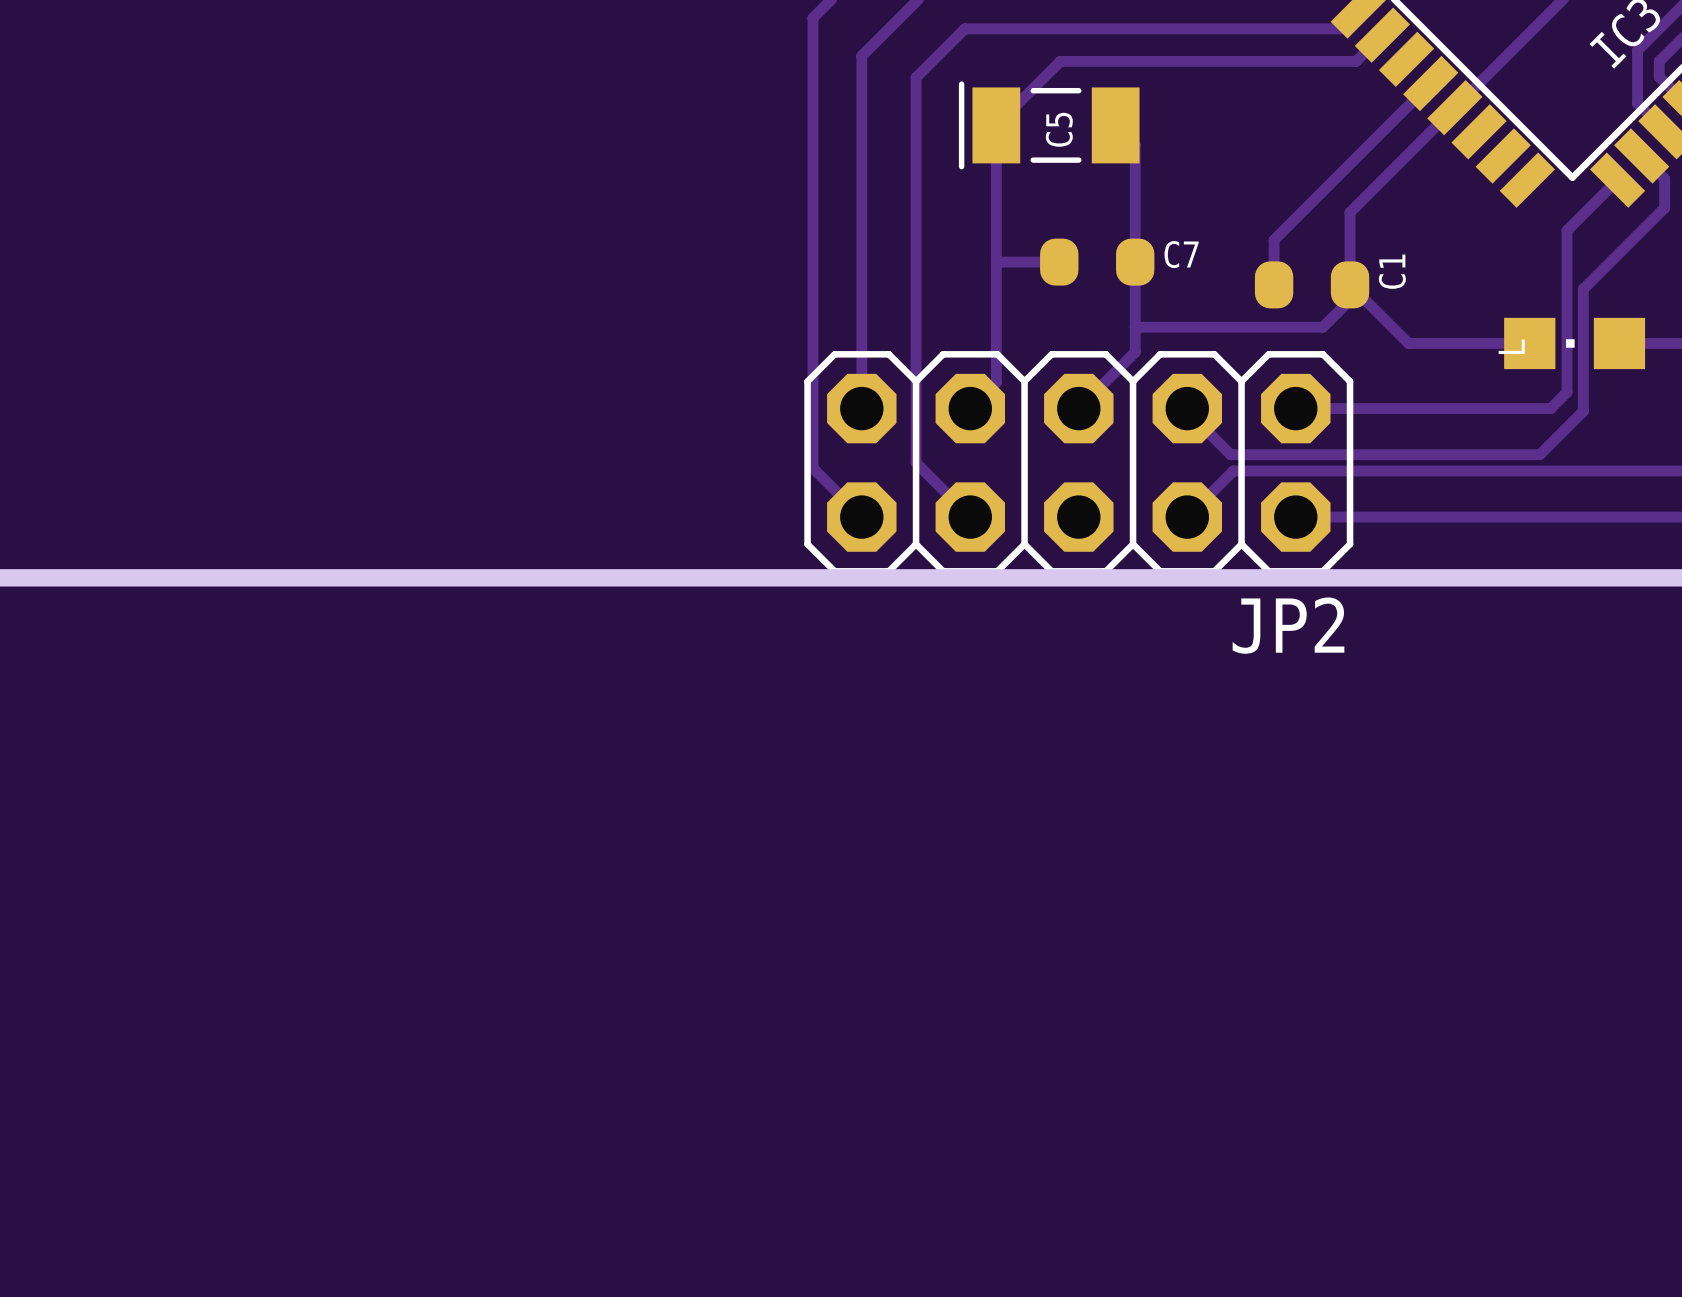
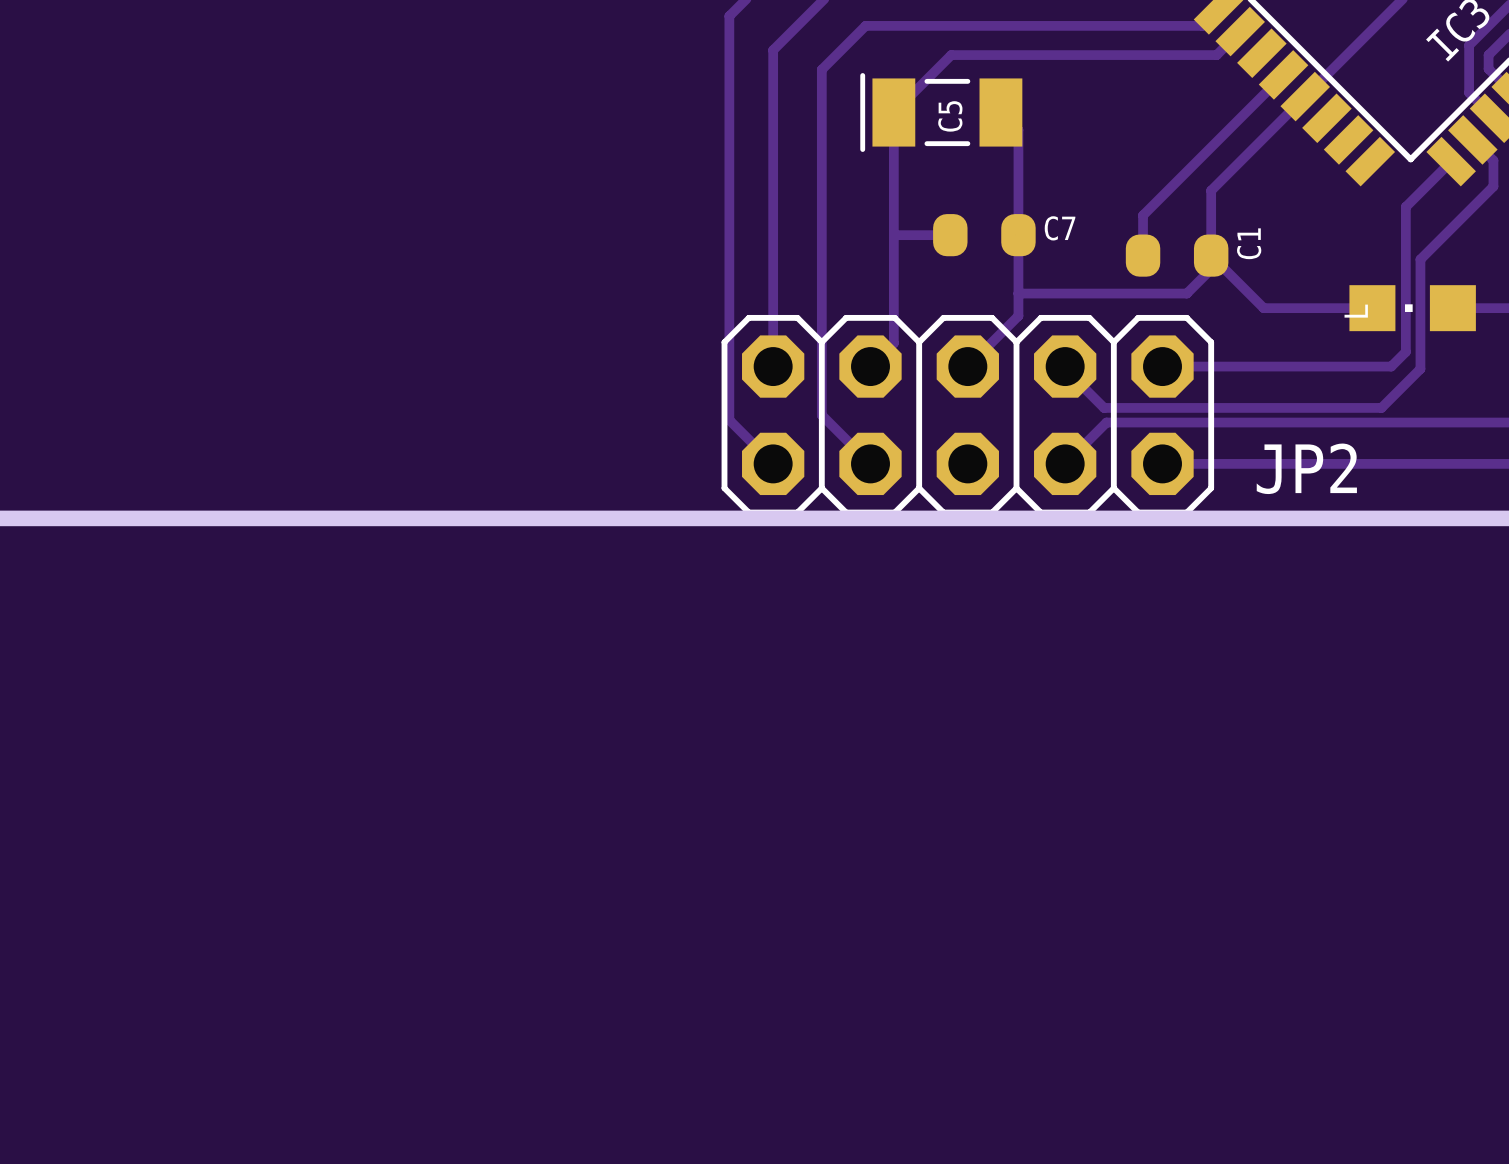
JP2 name position: JP2 (1288, 625) -> JP2 (1306, 468)

